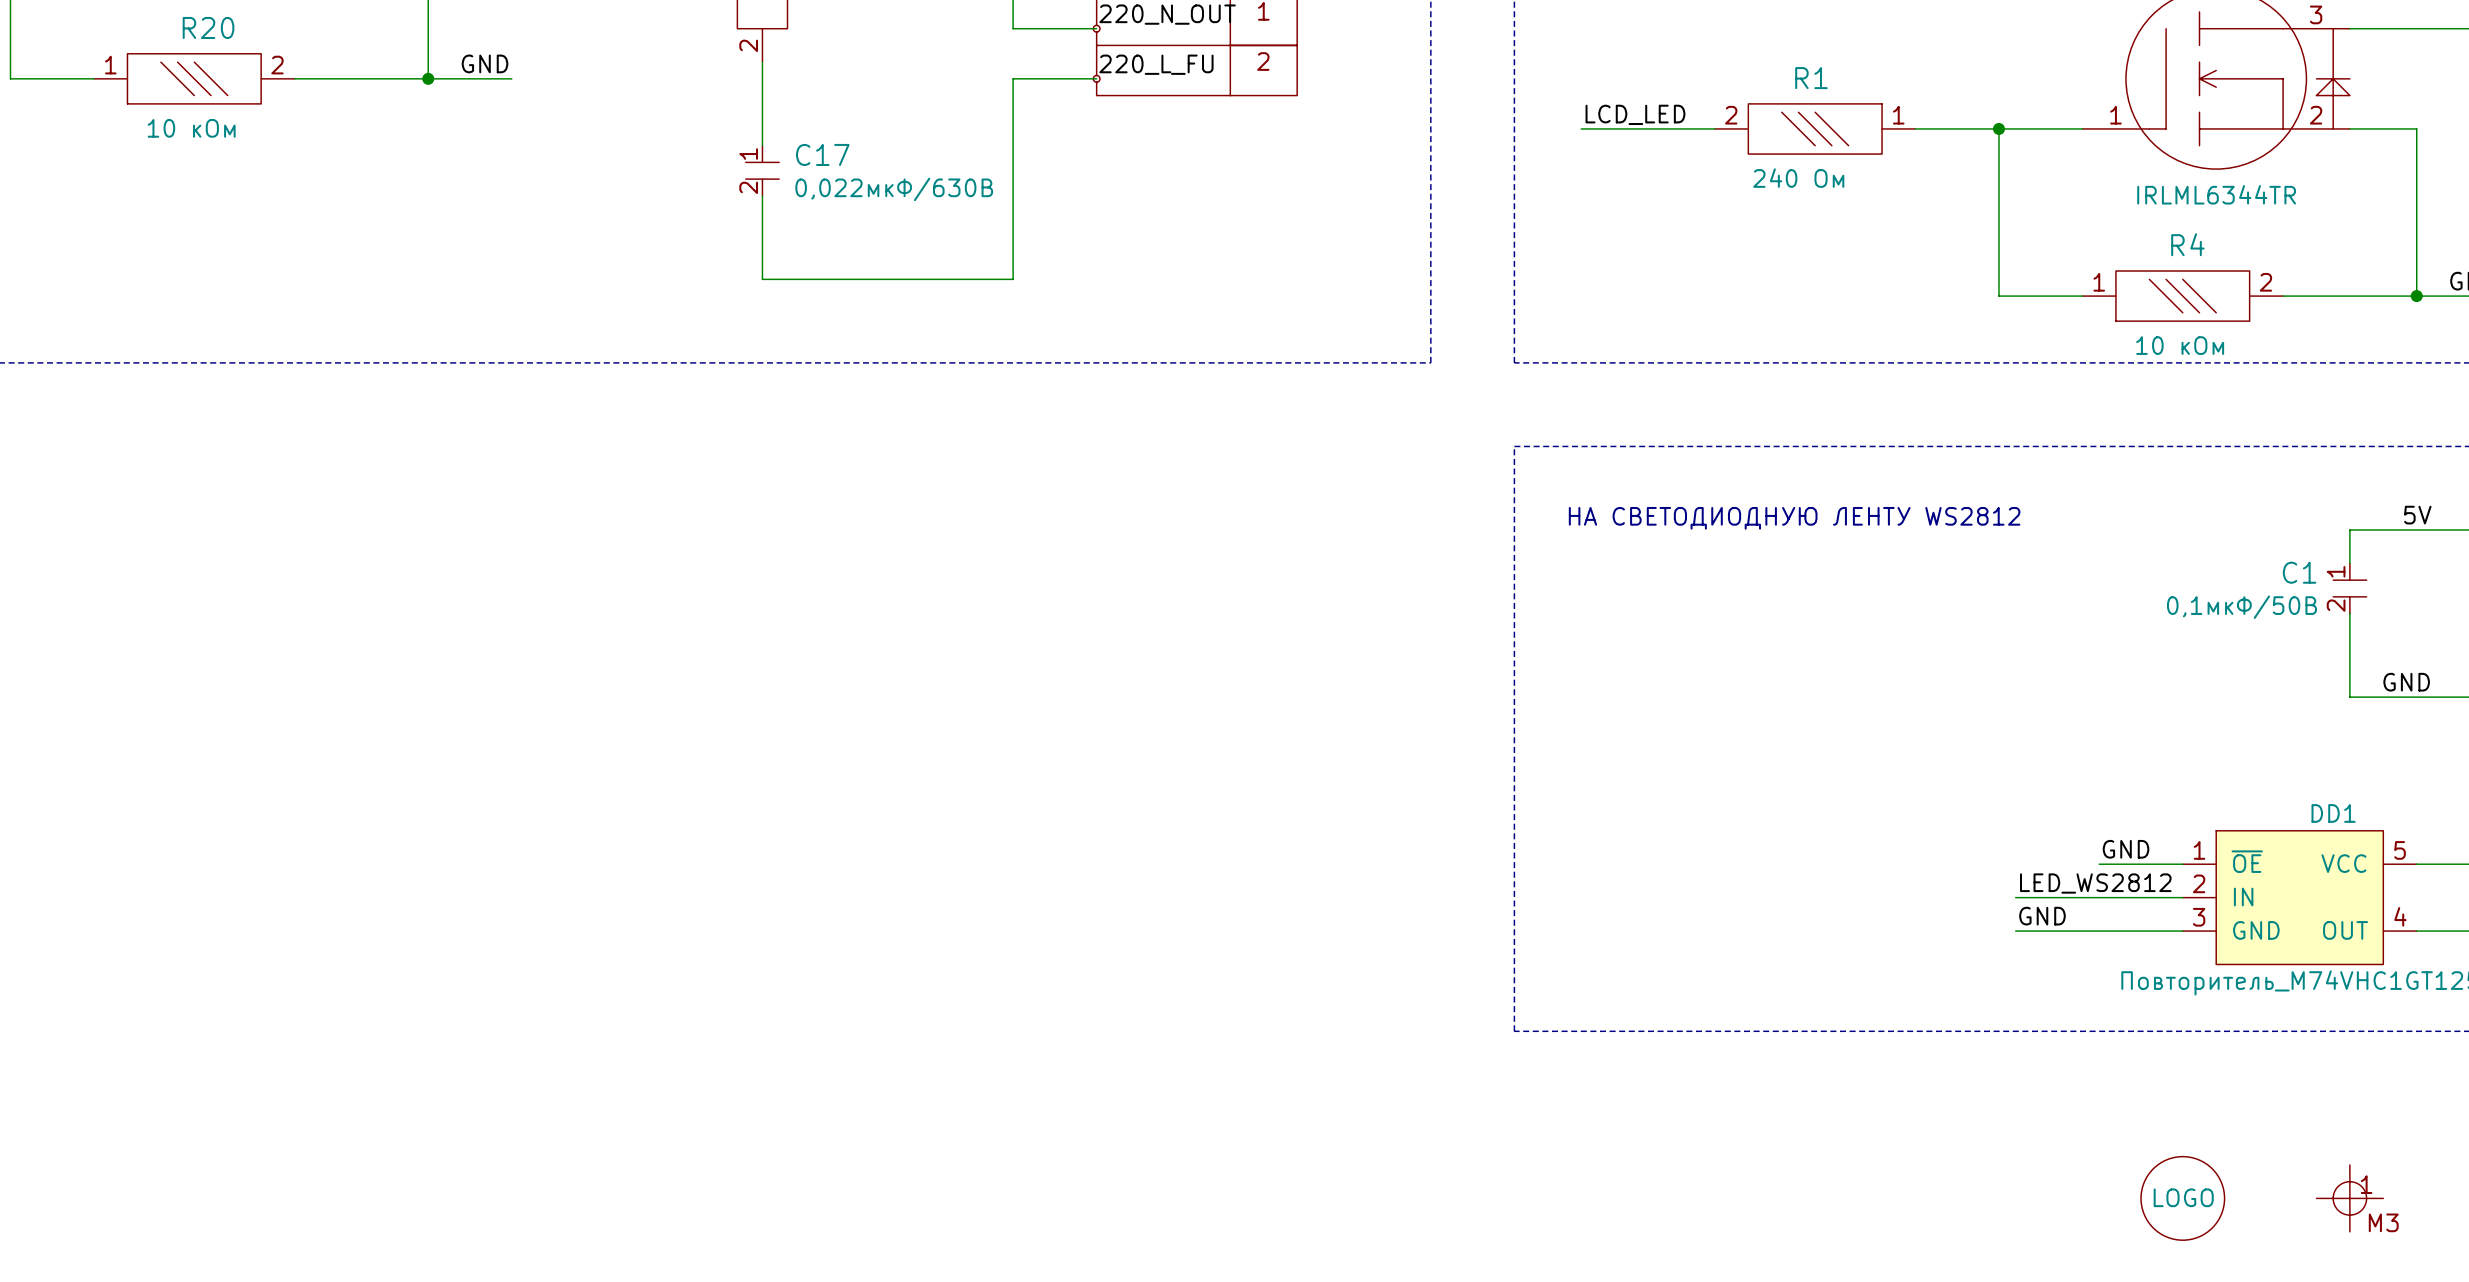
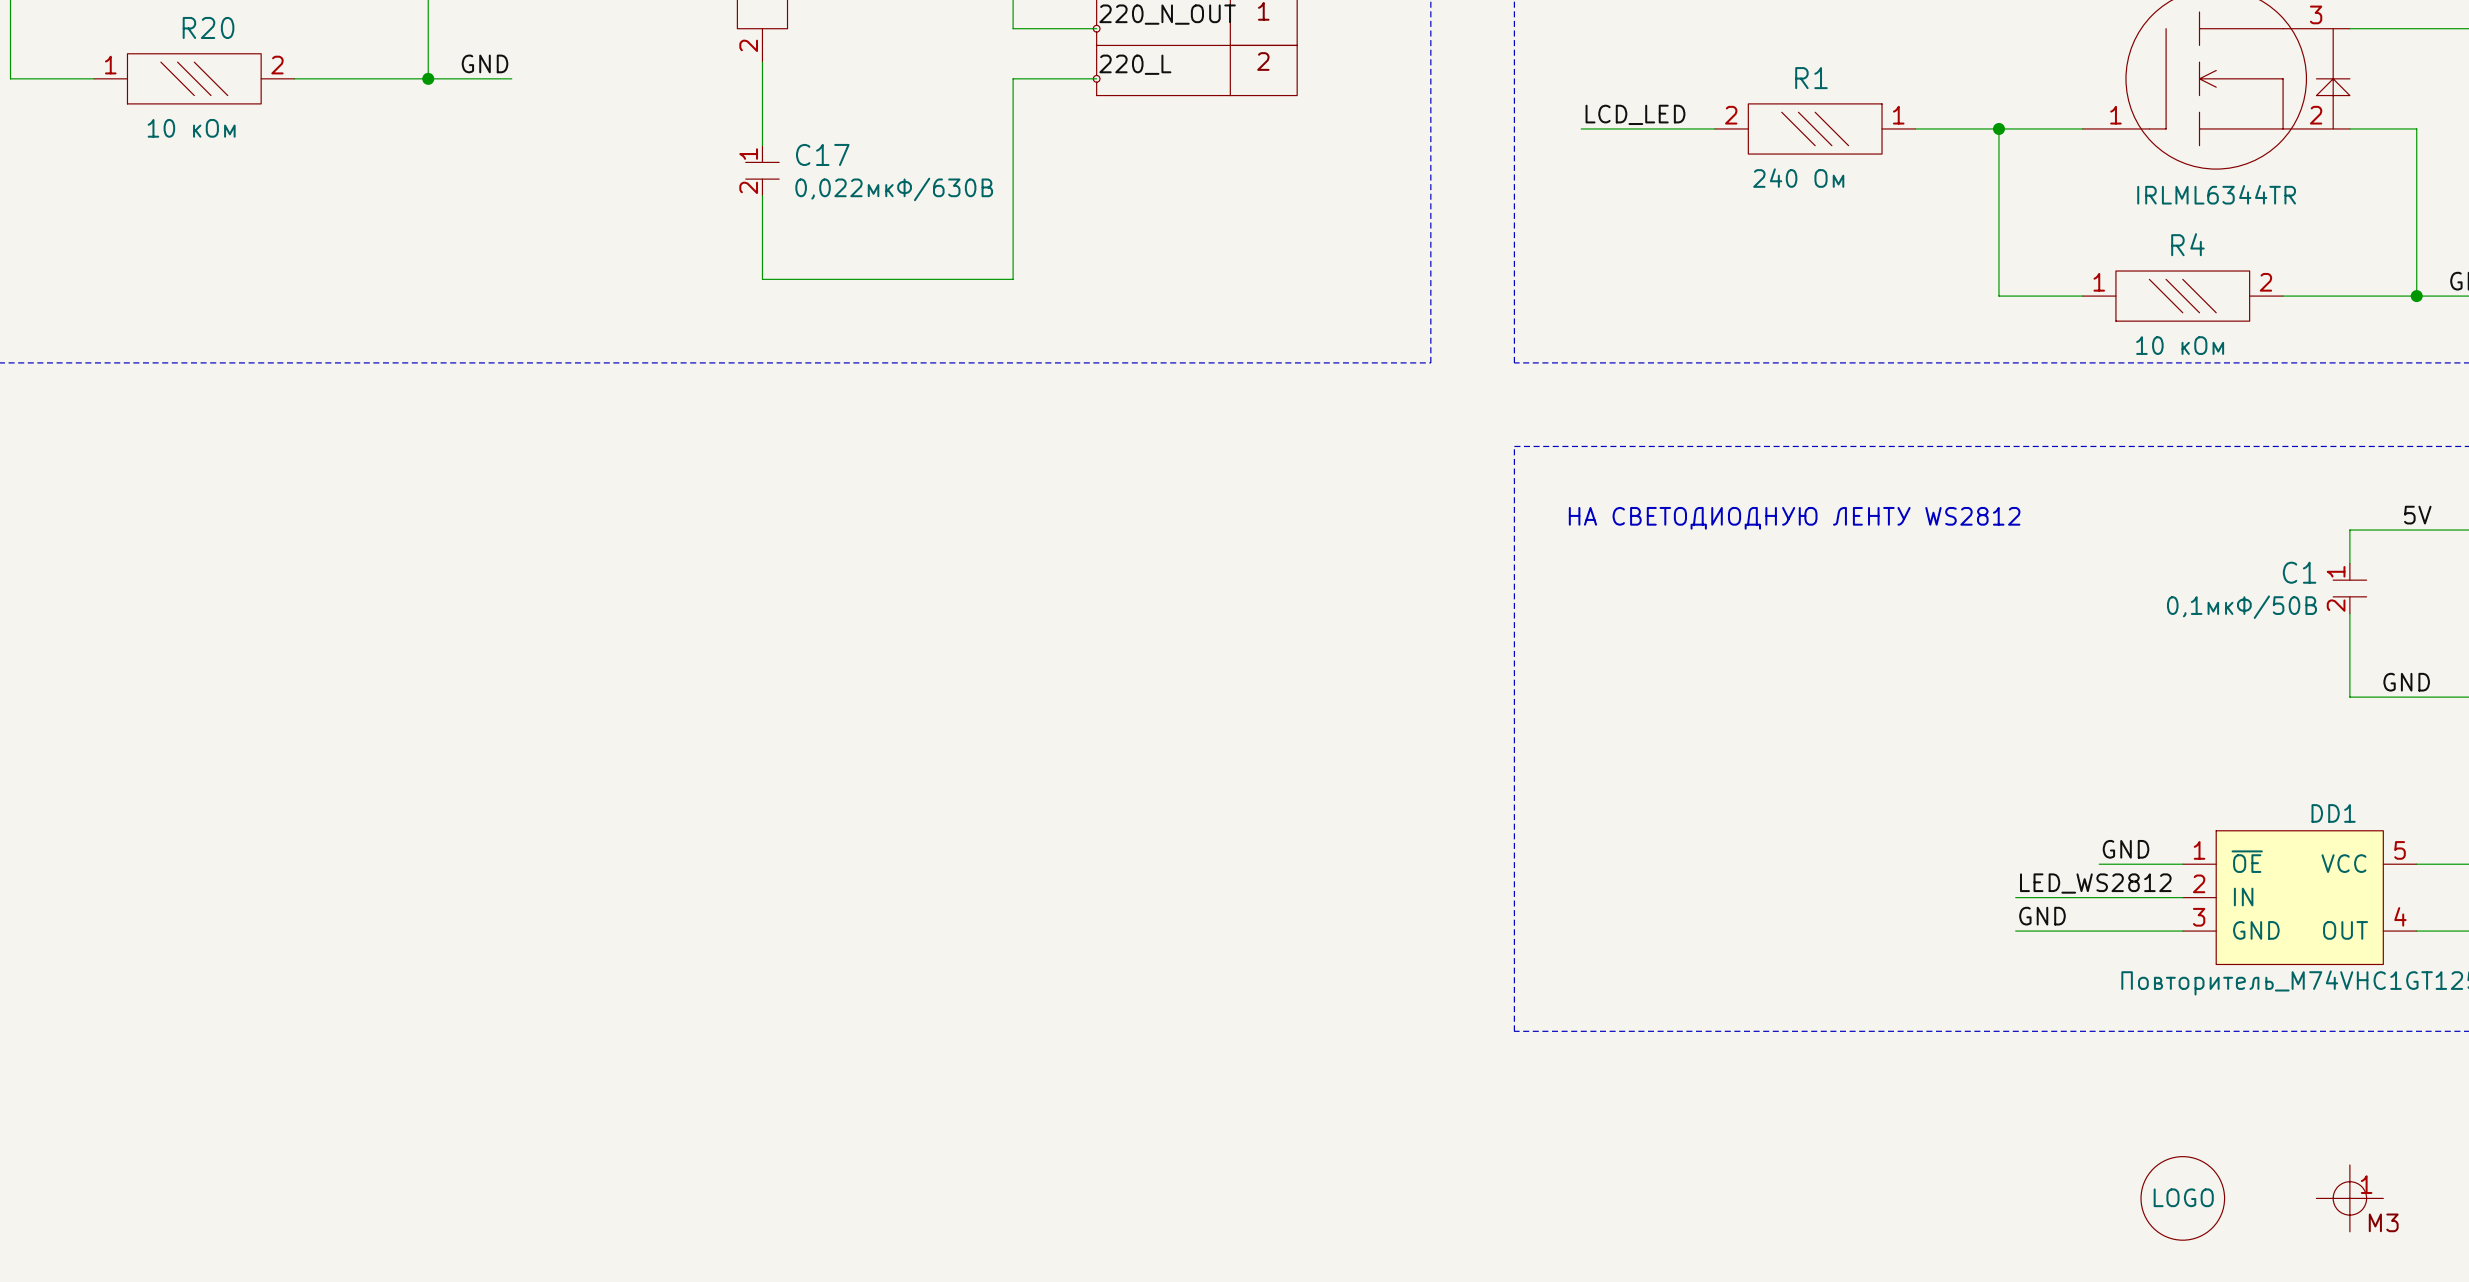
label: 220_L_FU (1156, 64) -> 220_L (1135, 64)

